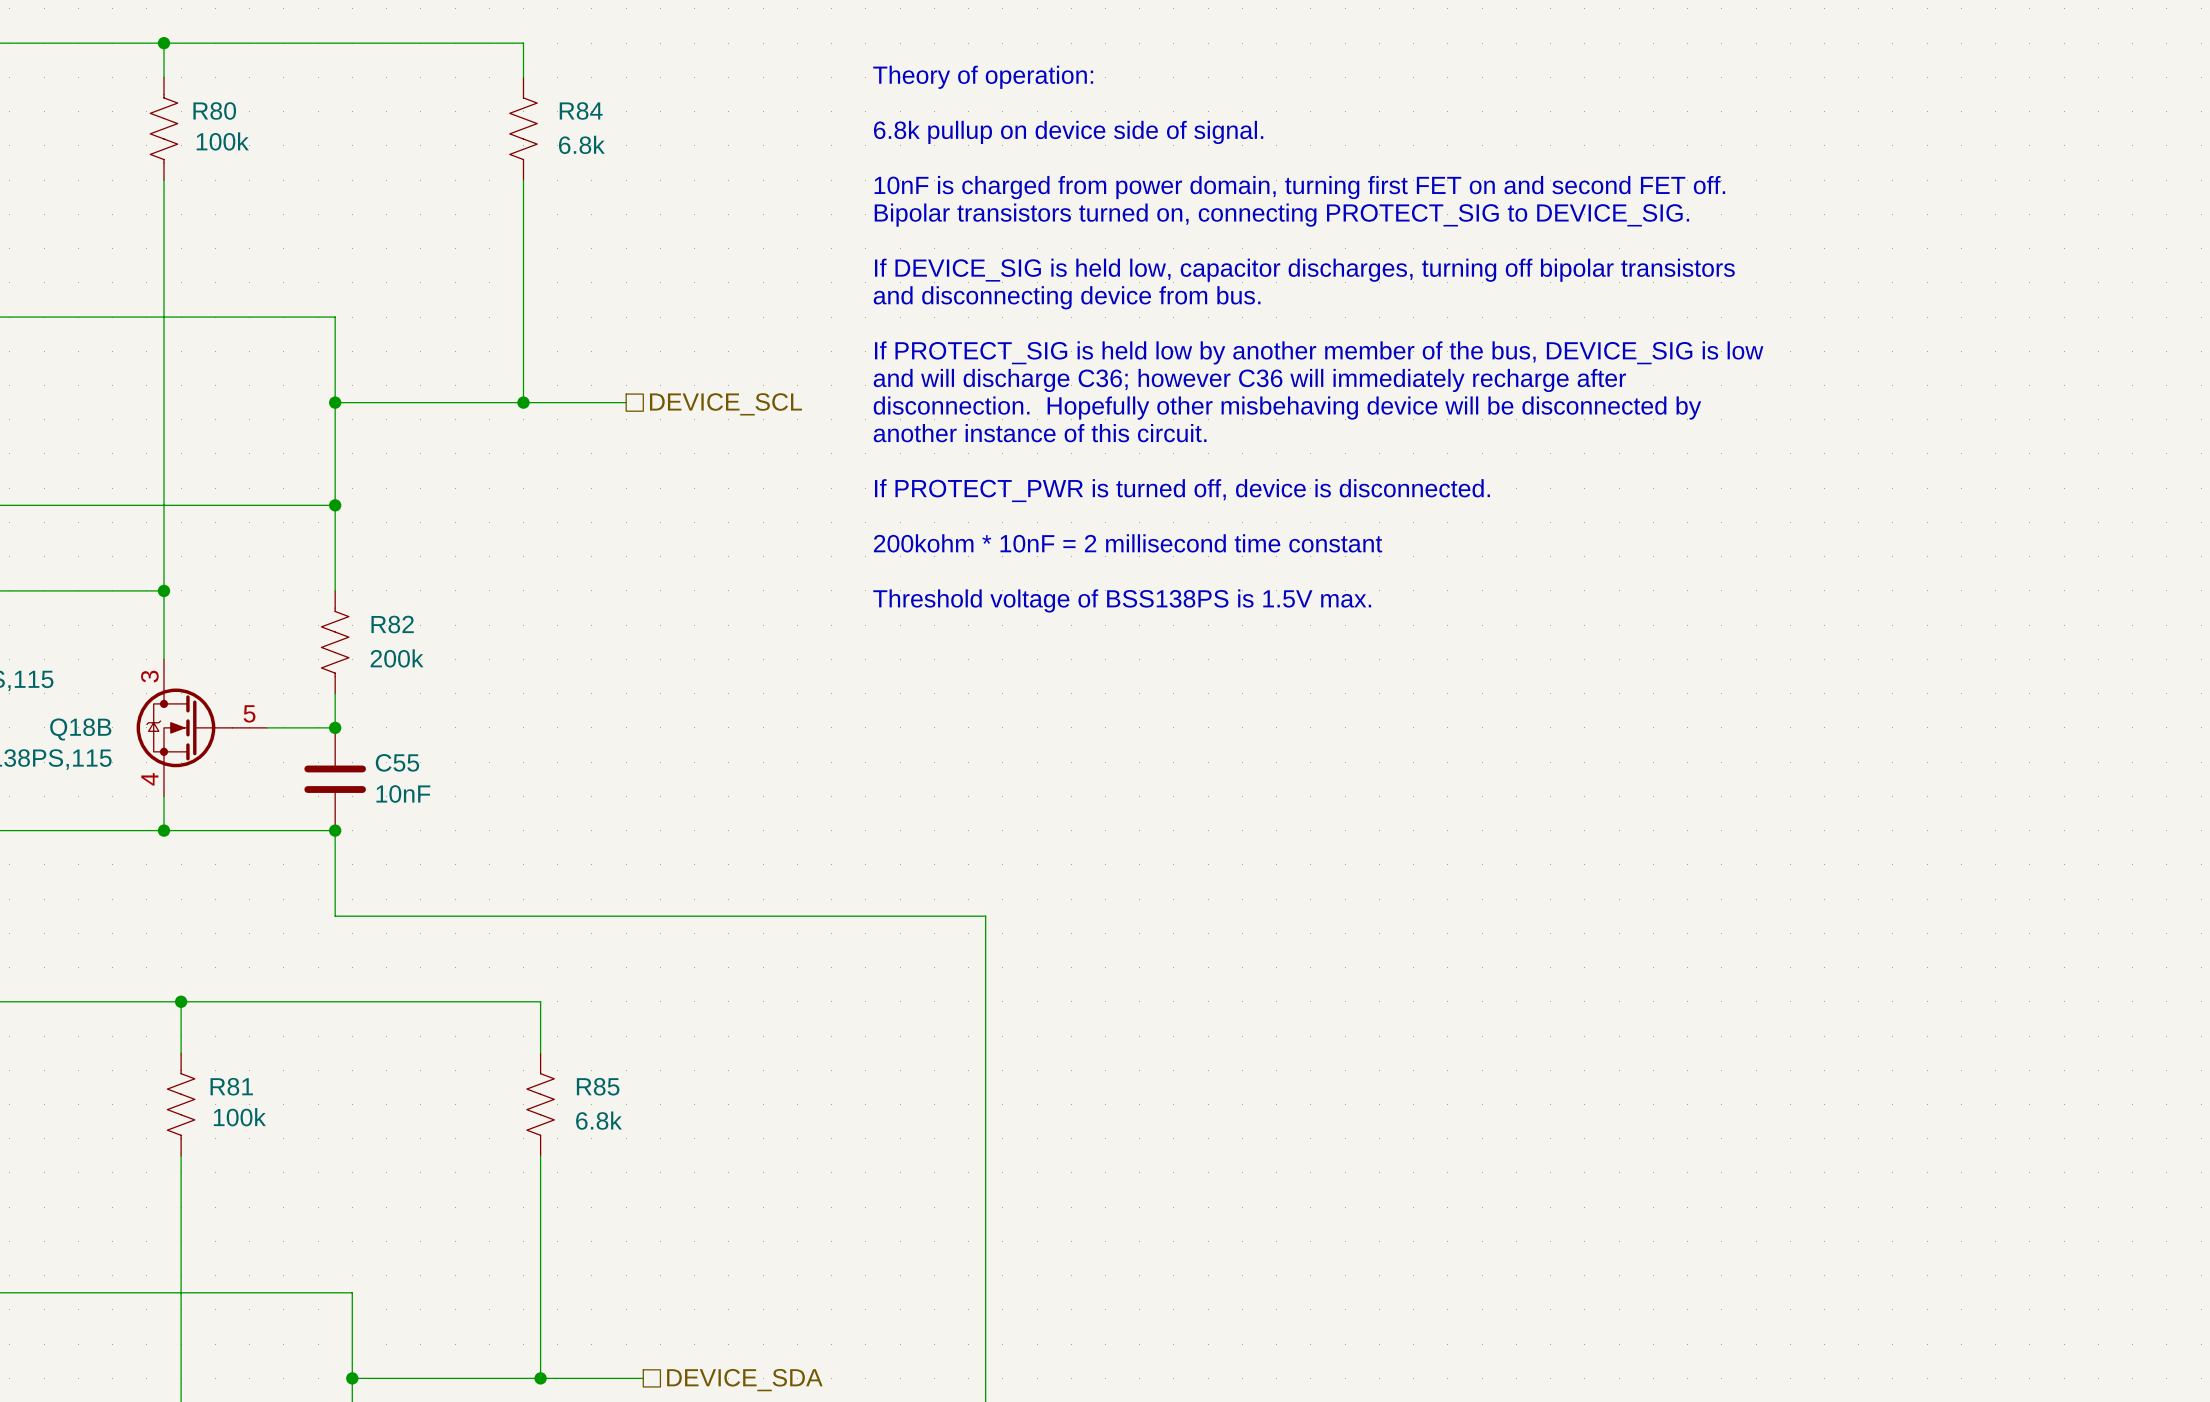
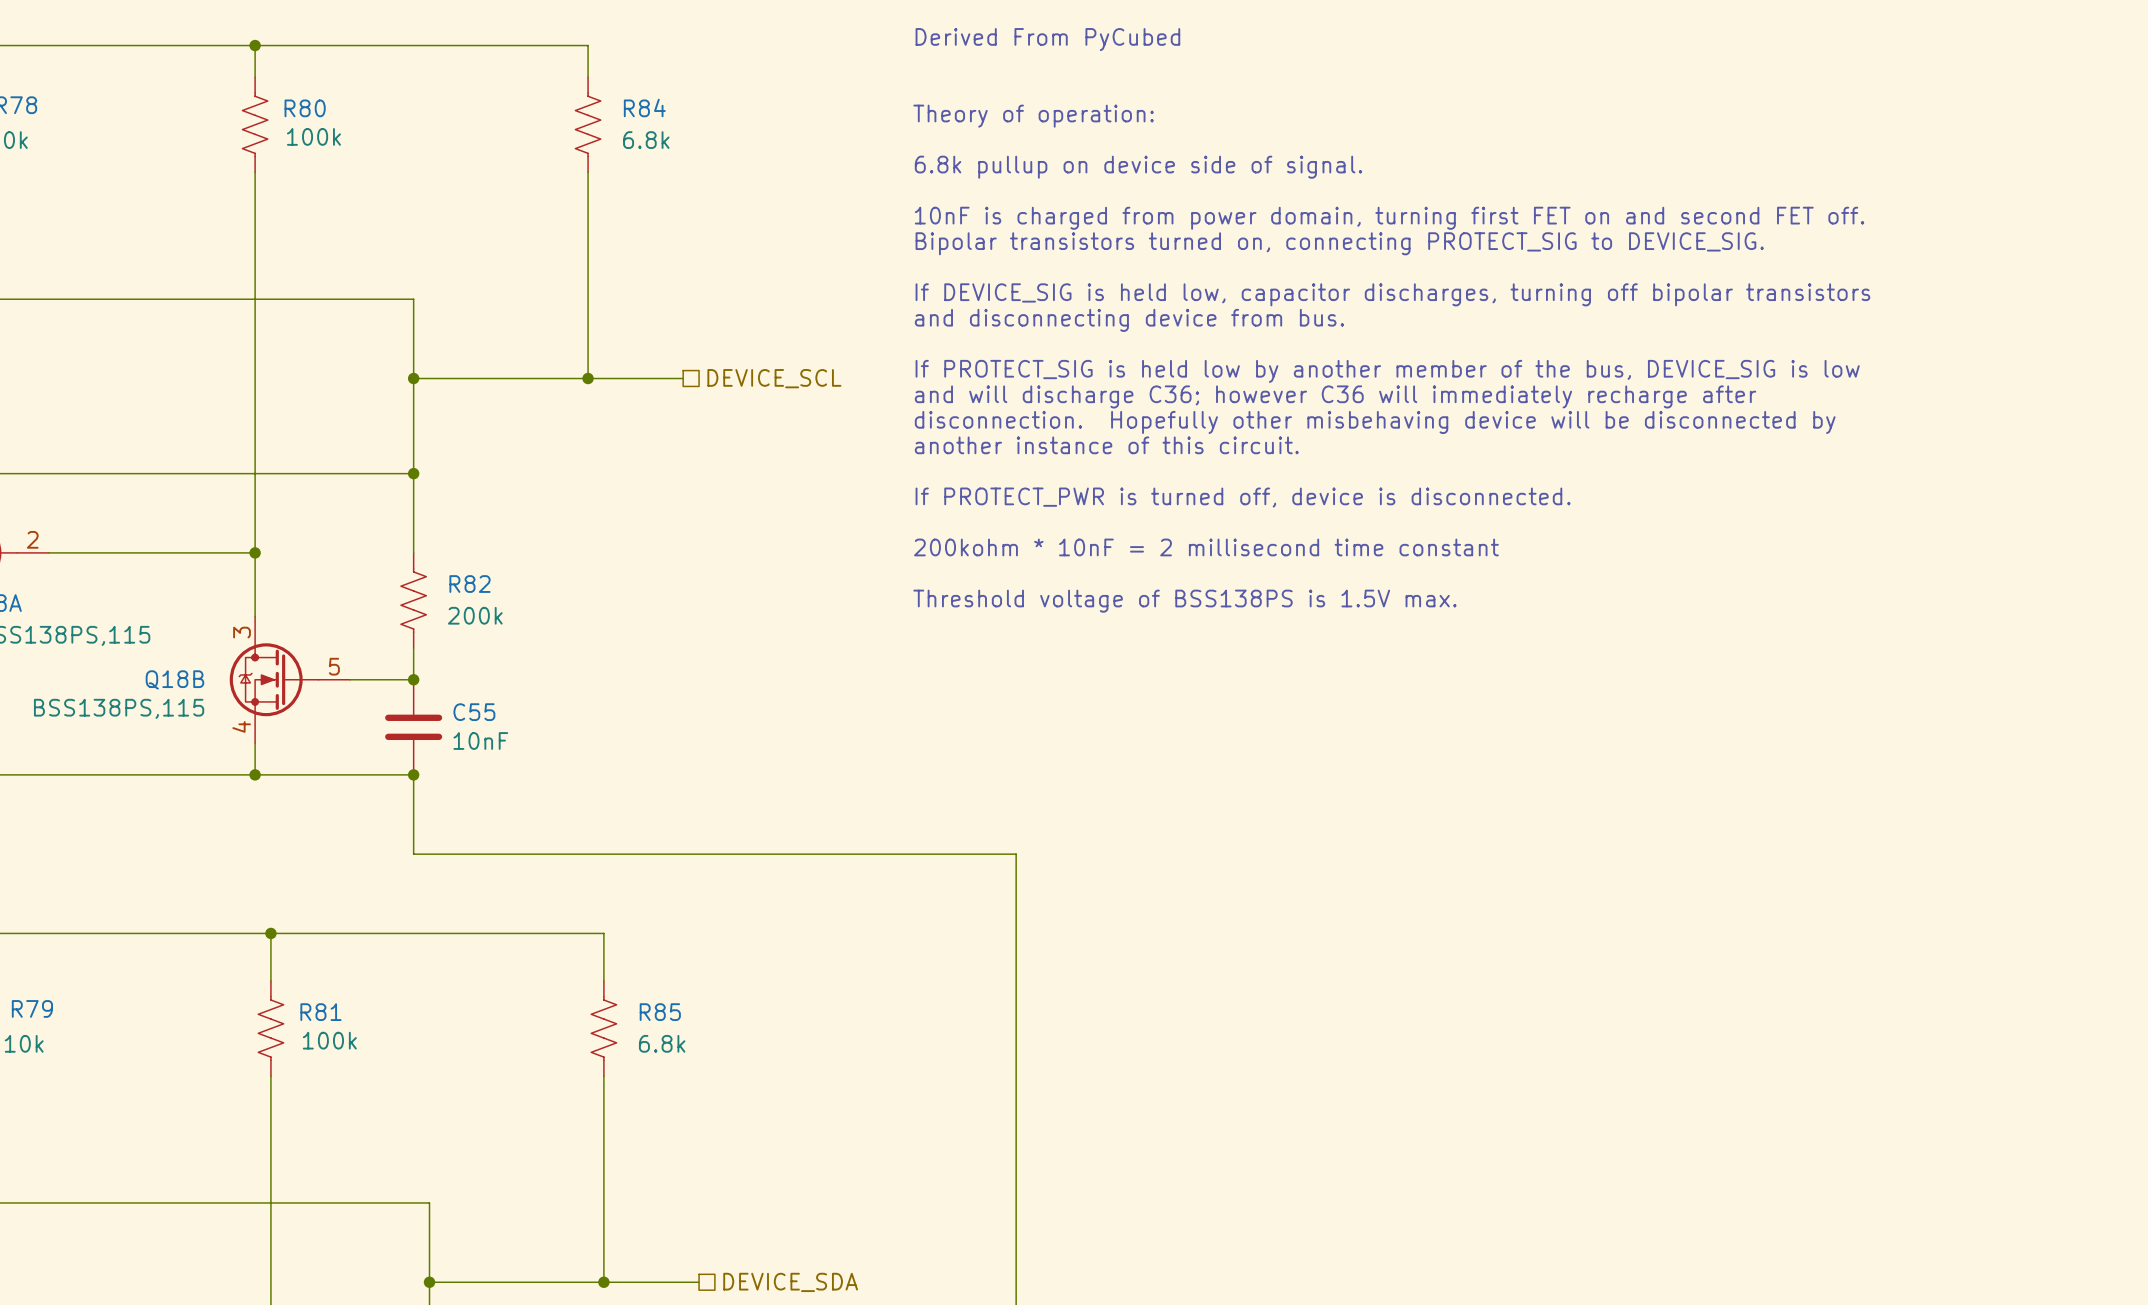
text: none -> Derived From PyCubed (1047, 39)
text position: Theory of operation: (983, 77) -> Theory of operation: (1033, 116)
text position: 6.8k pullup on device side of signal. (1068, 132) -> 6.8k pullup on device side of signal. (1138, 167)
text position: 10nF is charged from power domain, turning first FET on and second FET off. (1299, 187) -> 10nF is charged from power domain, turning first FET on and second FET off. (1389, 218)
text position: Bipolar transistors turned on, connecting PROTECT_SIG to DEVICE_SIG. (1281, 215) -> Bipolar transistors turned on, connecting PROTECT_SIG to DEVICE_SIG. (1339, 243)
text position: If DEVICE_SIG is held low, capacitor discharges, turning off bipolar transistors (1304, 270) -> If DEVICE_SIG is held low, capacitor discharges, turning off bipolar transistors (1392, 294)
text position: and disconnecting device from bus. (1067, 297) -> and disconnecting device from bus. (1129, 320)
text position: If PROTECT_SIG is held low by another member of the bus, DEVICE_SIG is low (1319, 352) -> If PROTECT_SIG is held low by another member of the bus, DEVICE_SIG is low (1387, 371)
text position: and will discharge C36; however C36 will immediately recharge after (1249, 380) -> and will discharge C36; however C36 will immediately recharge after (1335, 396)
text position: disconnection. Hopefully other misbehaving device will be disconnected by (1287, 408) -> disconnection. Hopefully other misbehaving device will be disconnected by (1375, 422)
text position: another instance of this circuit. (1040, 433) -> another instance of this circuit. (1106, 445)
text position: If PROTECT_PWR is turned off, device is disconnected. (1182, 490) -> If PROTECT_PWR is turned off, device is disconnected. (1243, 497)
text position: 200kohm * 10nF = 2 millisecond time constant (1128, 543) -> 200kohm * 10nF = 2 millisecond time constant (1206, 547)
text position: Threshold voltage of BSS138PS is 1.5V max. (1122, 600) -> Threshold voltage of BSS138PS is 1.5V max. (1184, 601)

